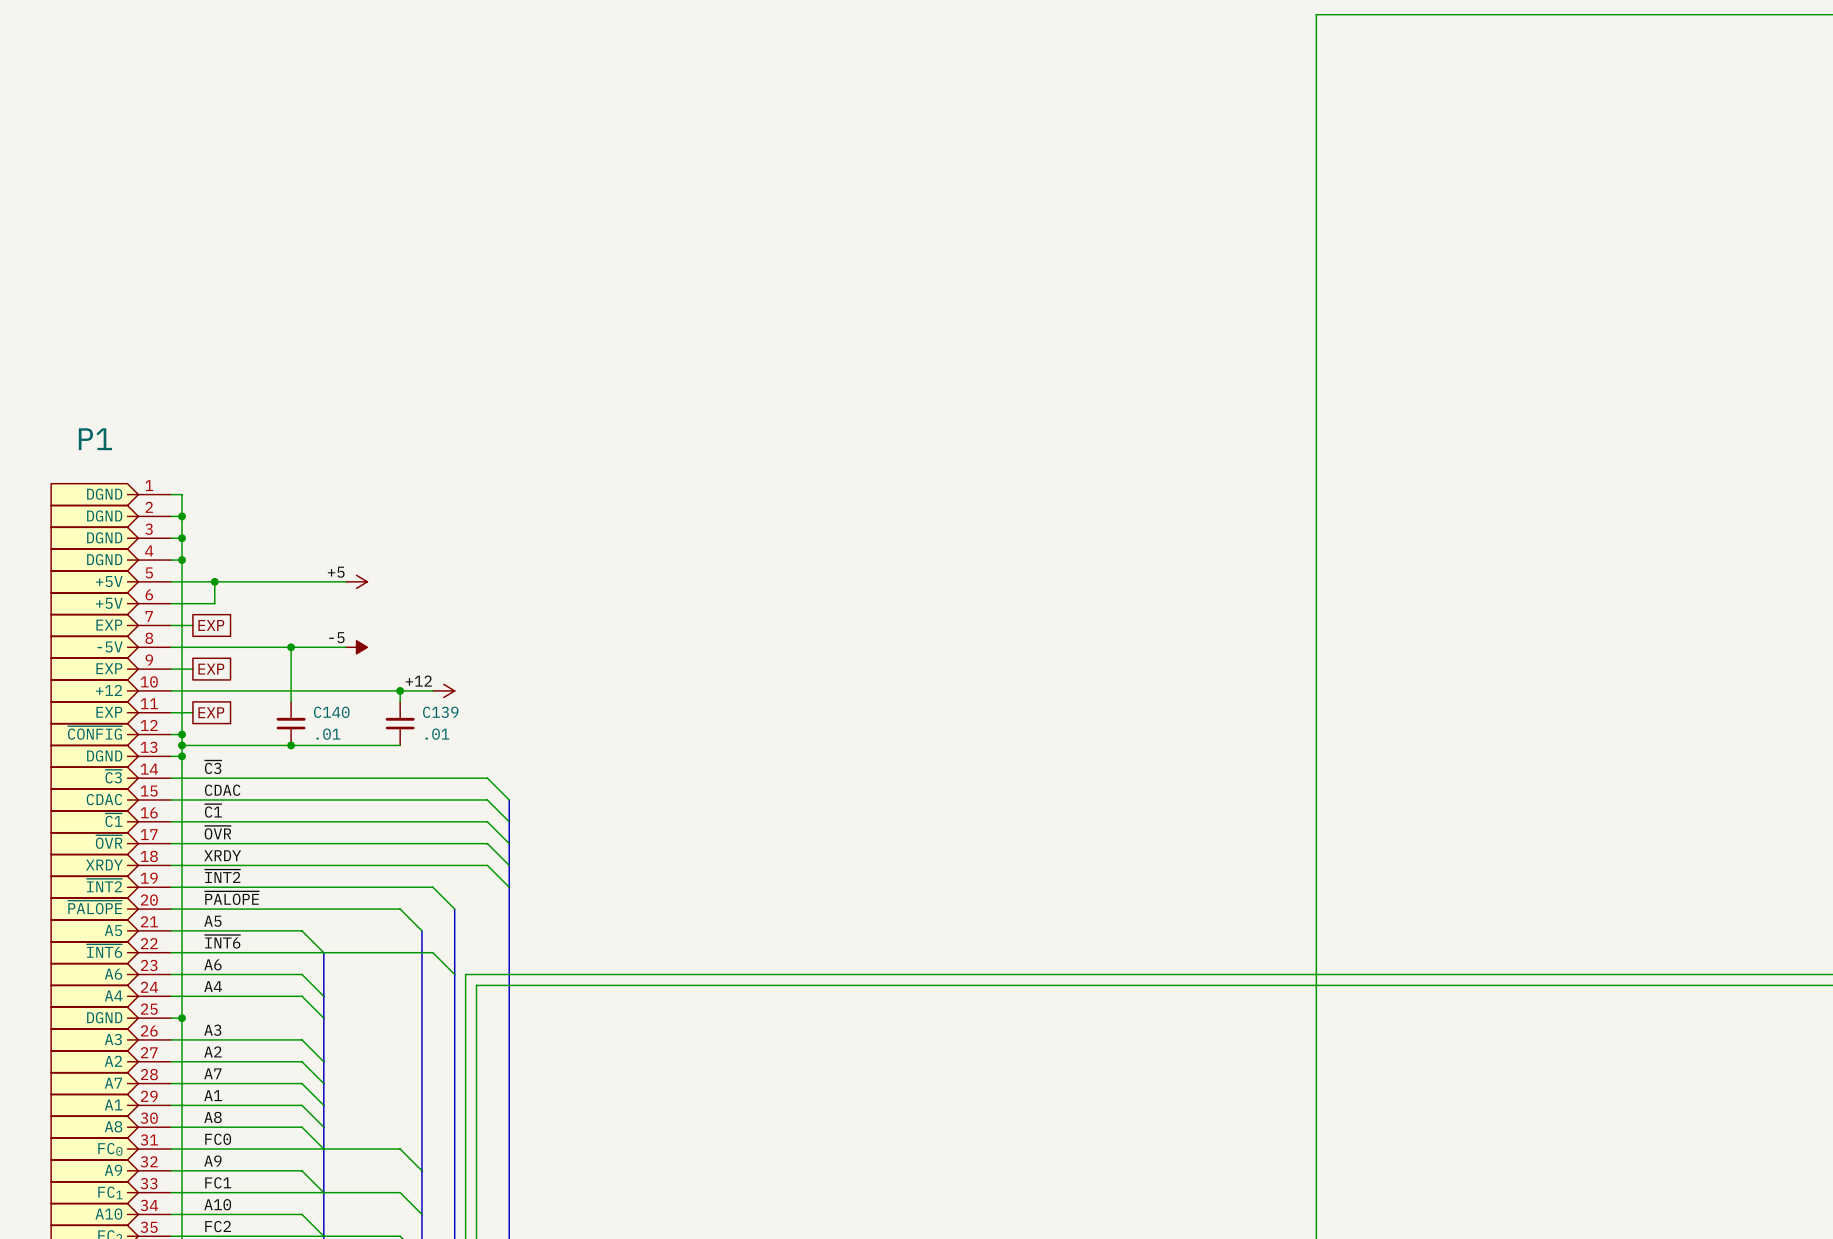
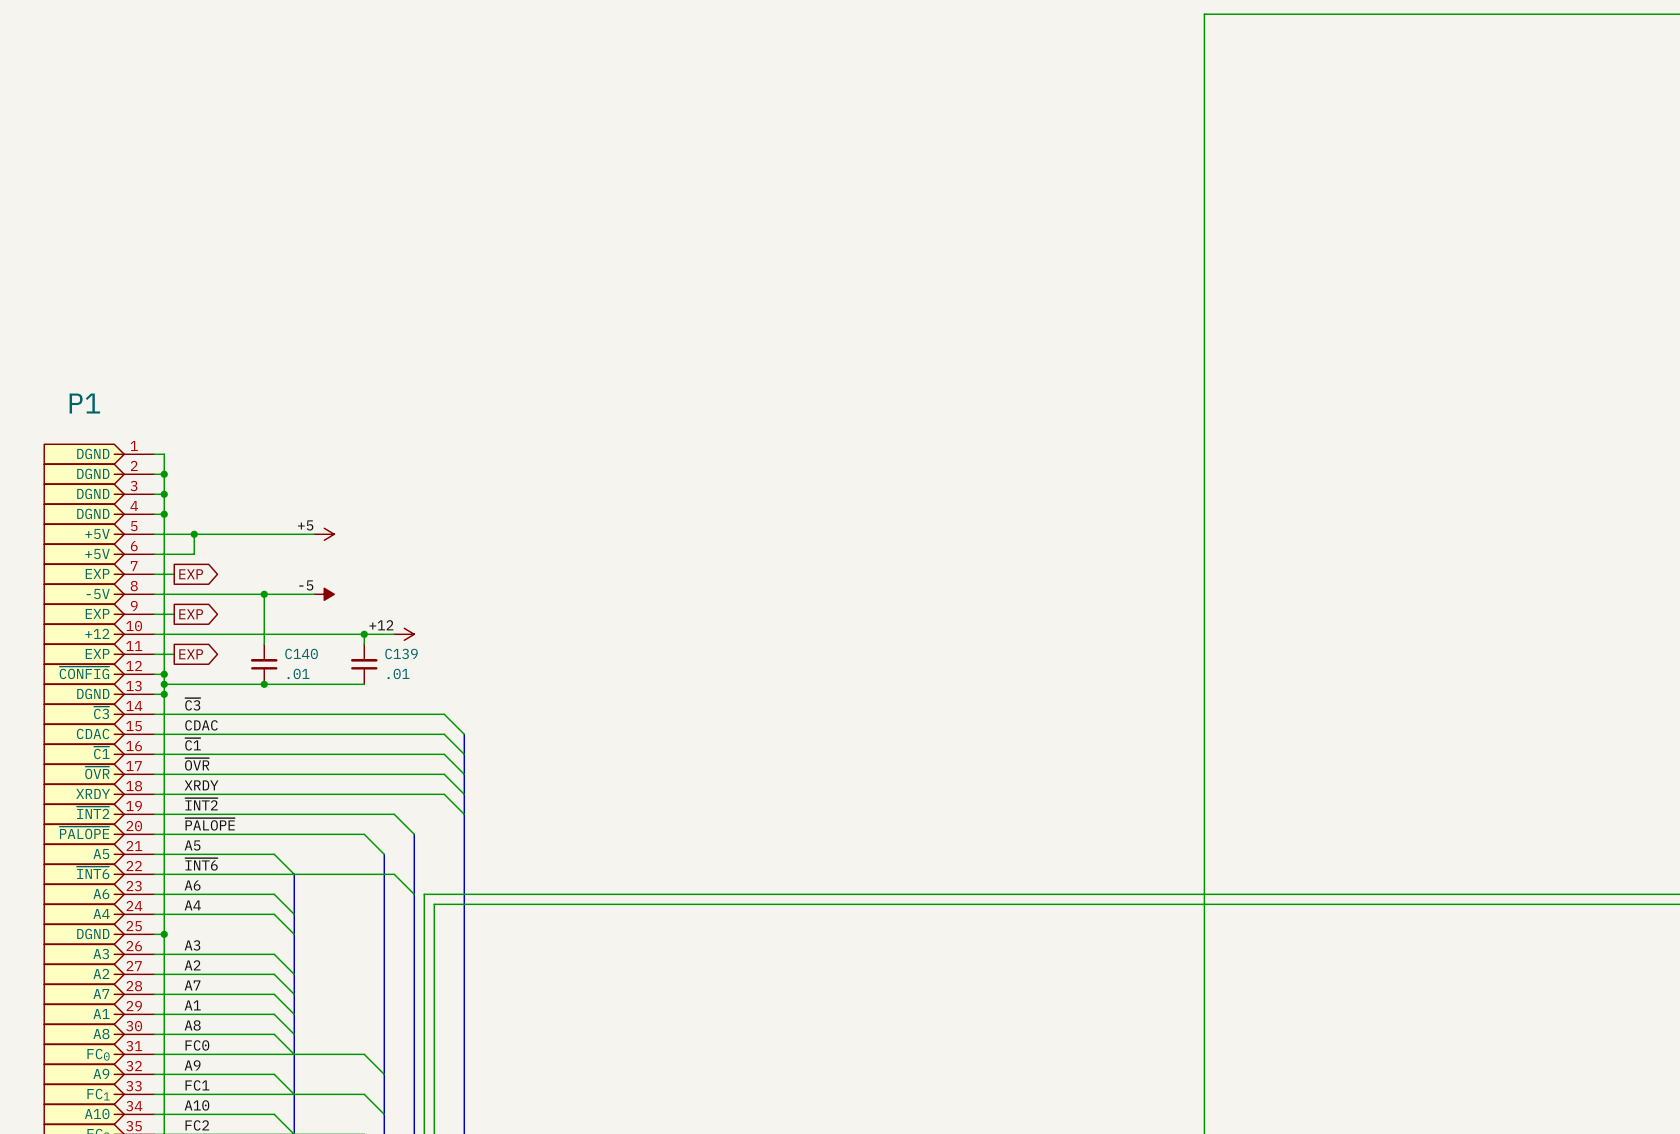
global label shape: passive (211, 625) -> output (191, 574)
global label shape: passive (211, 669) -> output (191, 614)
global label shape: passive (211, 712) -> output (191, 654)

